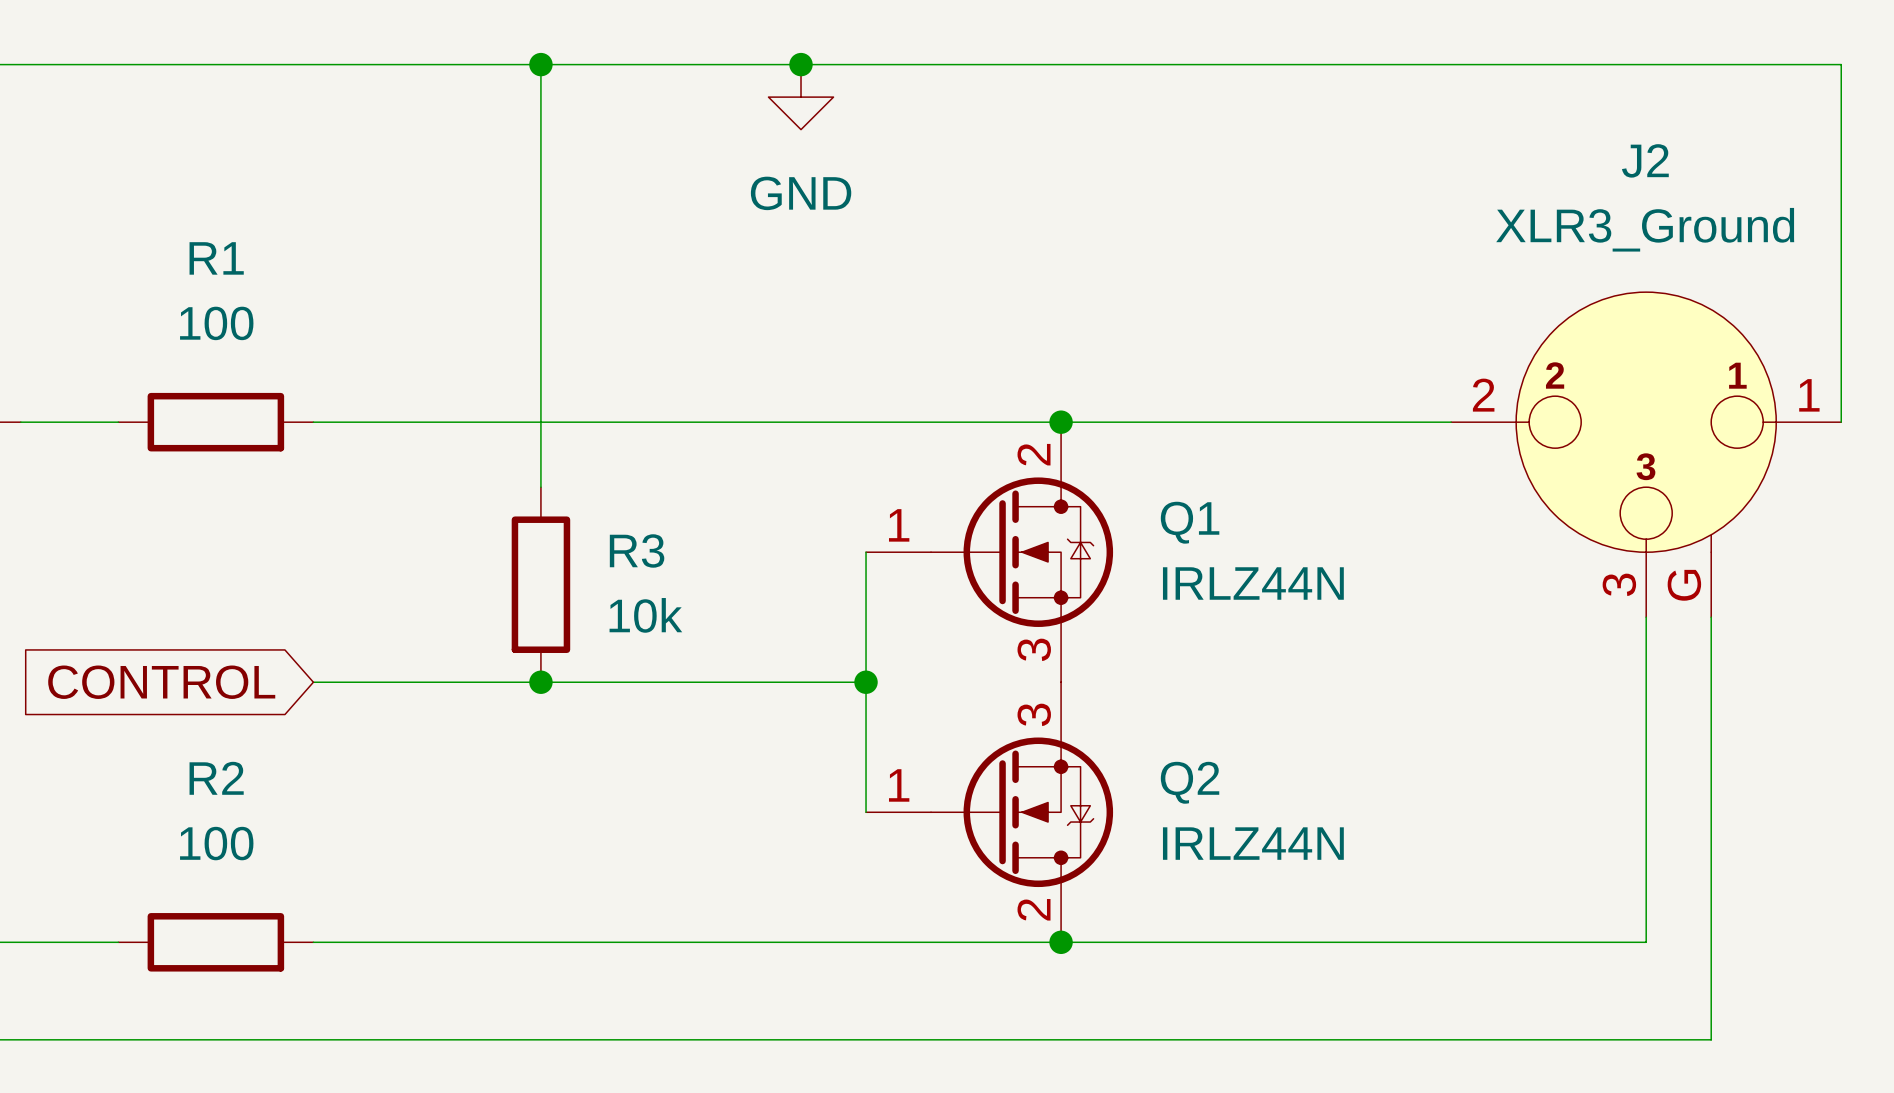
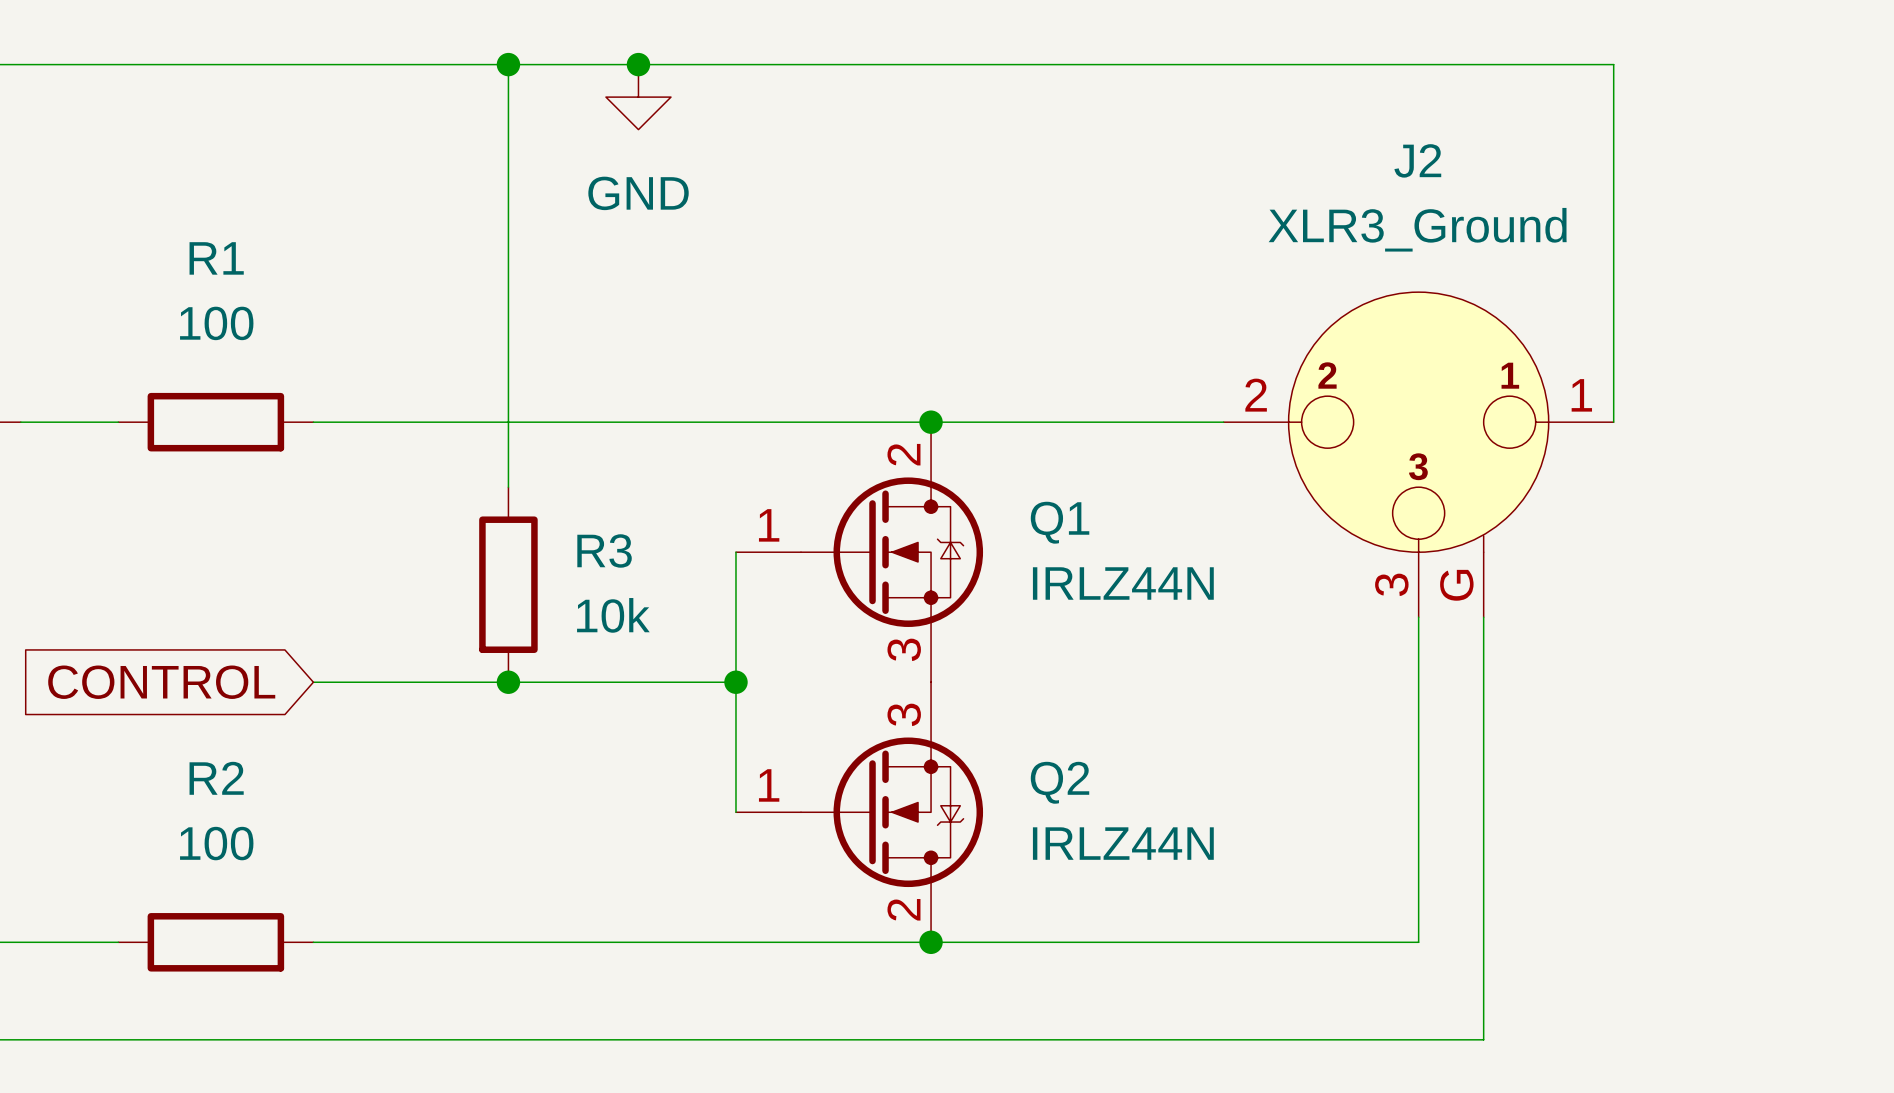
wire: (540, 64) (540, 487) -> (508, 64) (508, 487)
junction position: (540, 64) -> (508, 64)
junction: none -> (638, 64)
junction: (801, 64) -> none
wire: (1613, 64) (1841, 64) (1841, 422) -> (1613, 64) (1613, 422)
power symbol position: GND (801, 97) -> GND (638, 97)
junction position: (1061, 422) -> (931, 422)
J2 position: (1646, 454) -> (1418, 454)
wire: (866, 552) (866, 812) -> (735, 552) (735, 812)
Q1 position: (989, 552) -> (859, 552)
R3 position: (540, 584) -> (508, 584)
wire: (1646, 617) (1646, 942) (1418, 942) -> (1418, 617) (1418, 942)
wire: (1711, 617) (1711, 1039) (1483, 1039) -> (1483, 617) (1483, 1039)
junction position: (540, 682) -> (508, 682)
wire: (735, 682) (866, 682) -> none
junction: none -> (735, 682)
junction: (866, 682) -> none
Q2 position: (989, 812) -> (859, 812)
junction position: (1061, 942) -> (931, 942)

